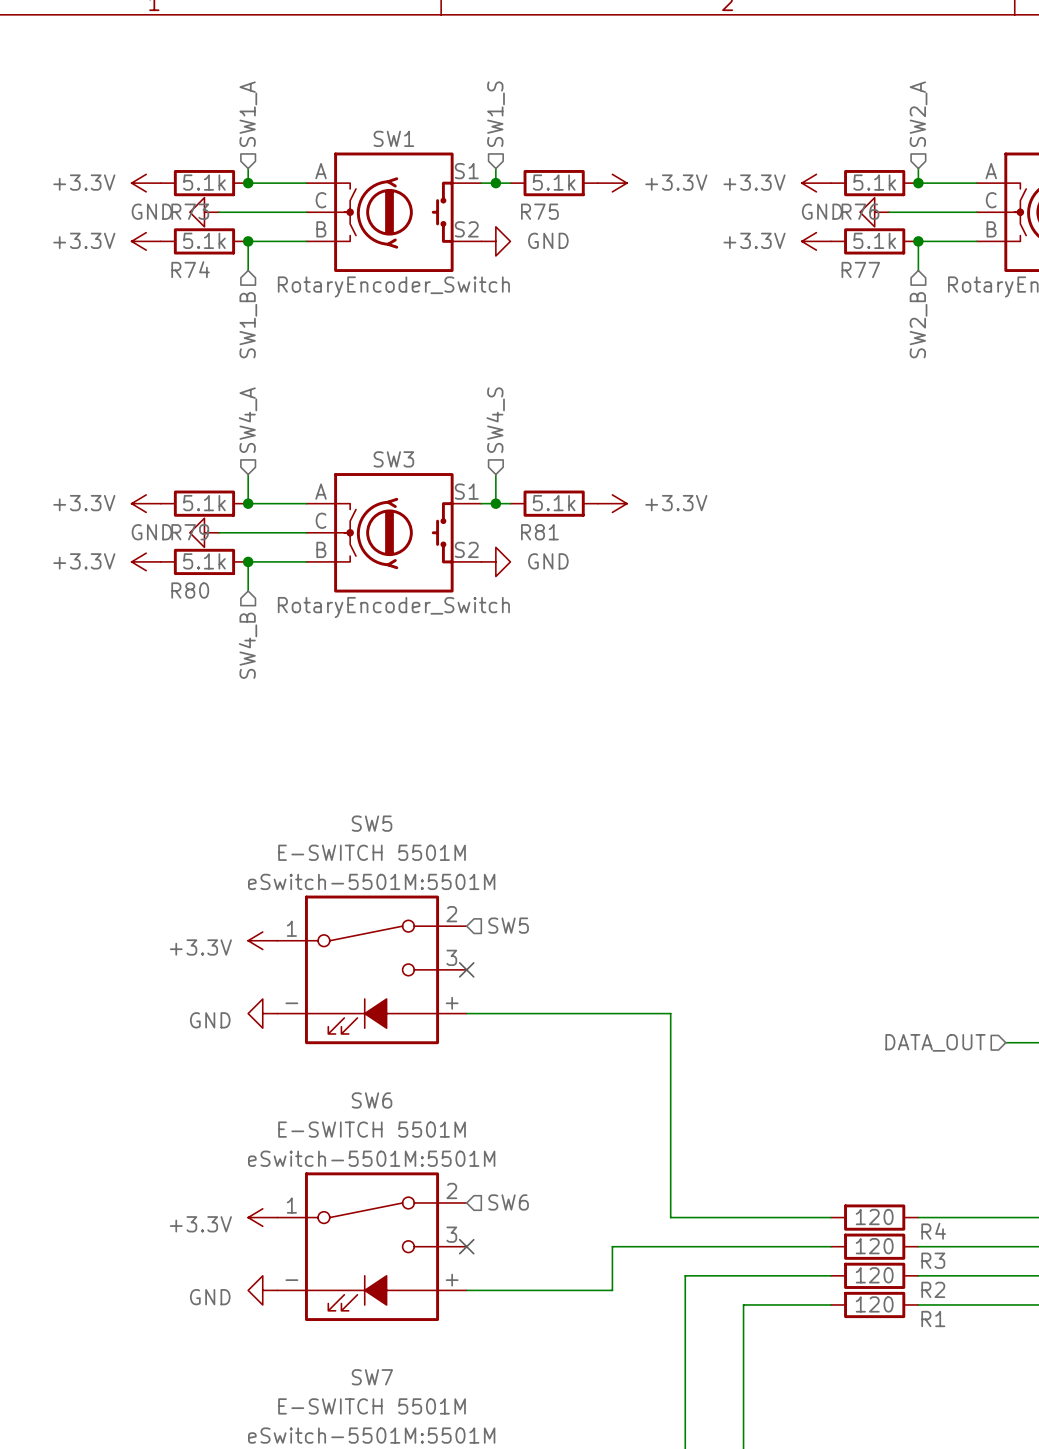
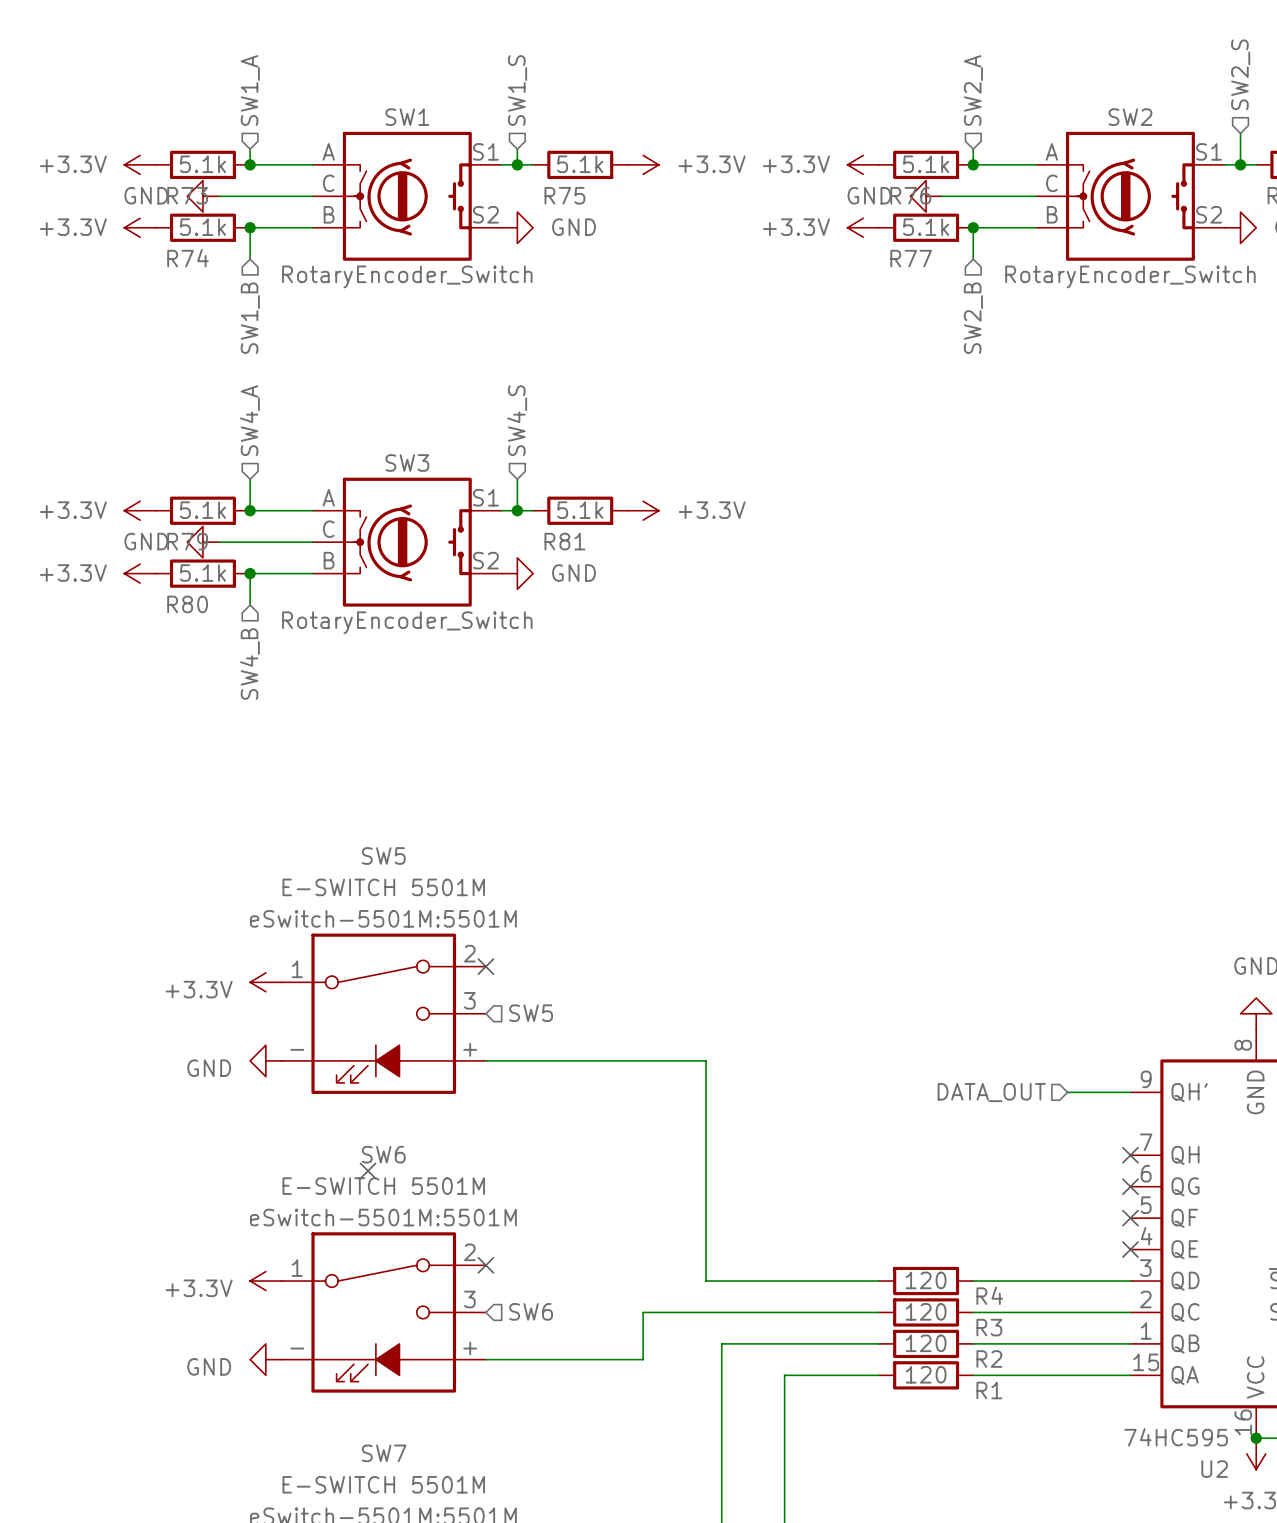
hierarchical label position: SW5 (508, 925) -> SW5 (531, 1013)
no-connect mark position: (466, 969) -> (485, 966)
no-connect mark: none -> (368, 1170)
hierarchical label position: SW6 (508, 1202) -> SW6 (531, 1311)
no-connect mark position: (466, 1246) -> (485, 1265)

